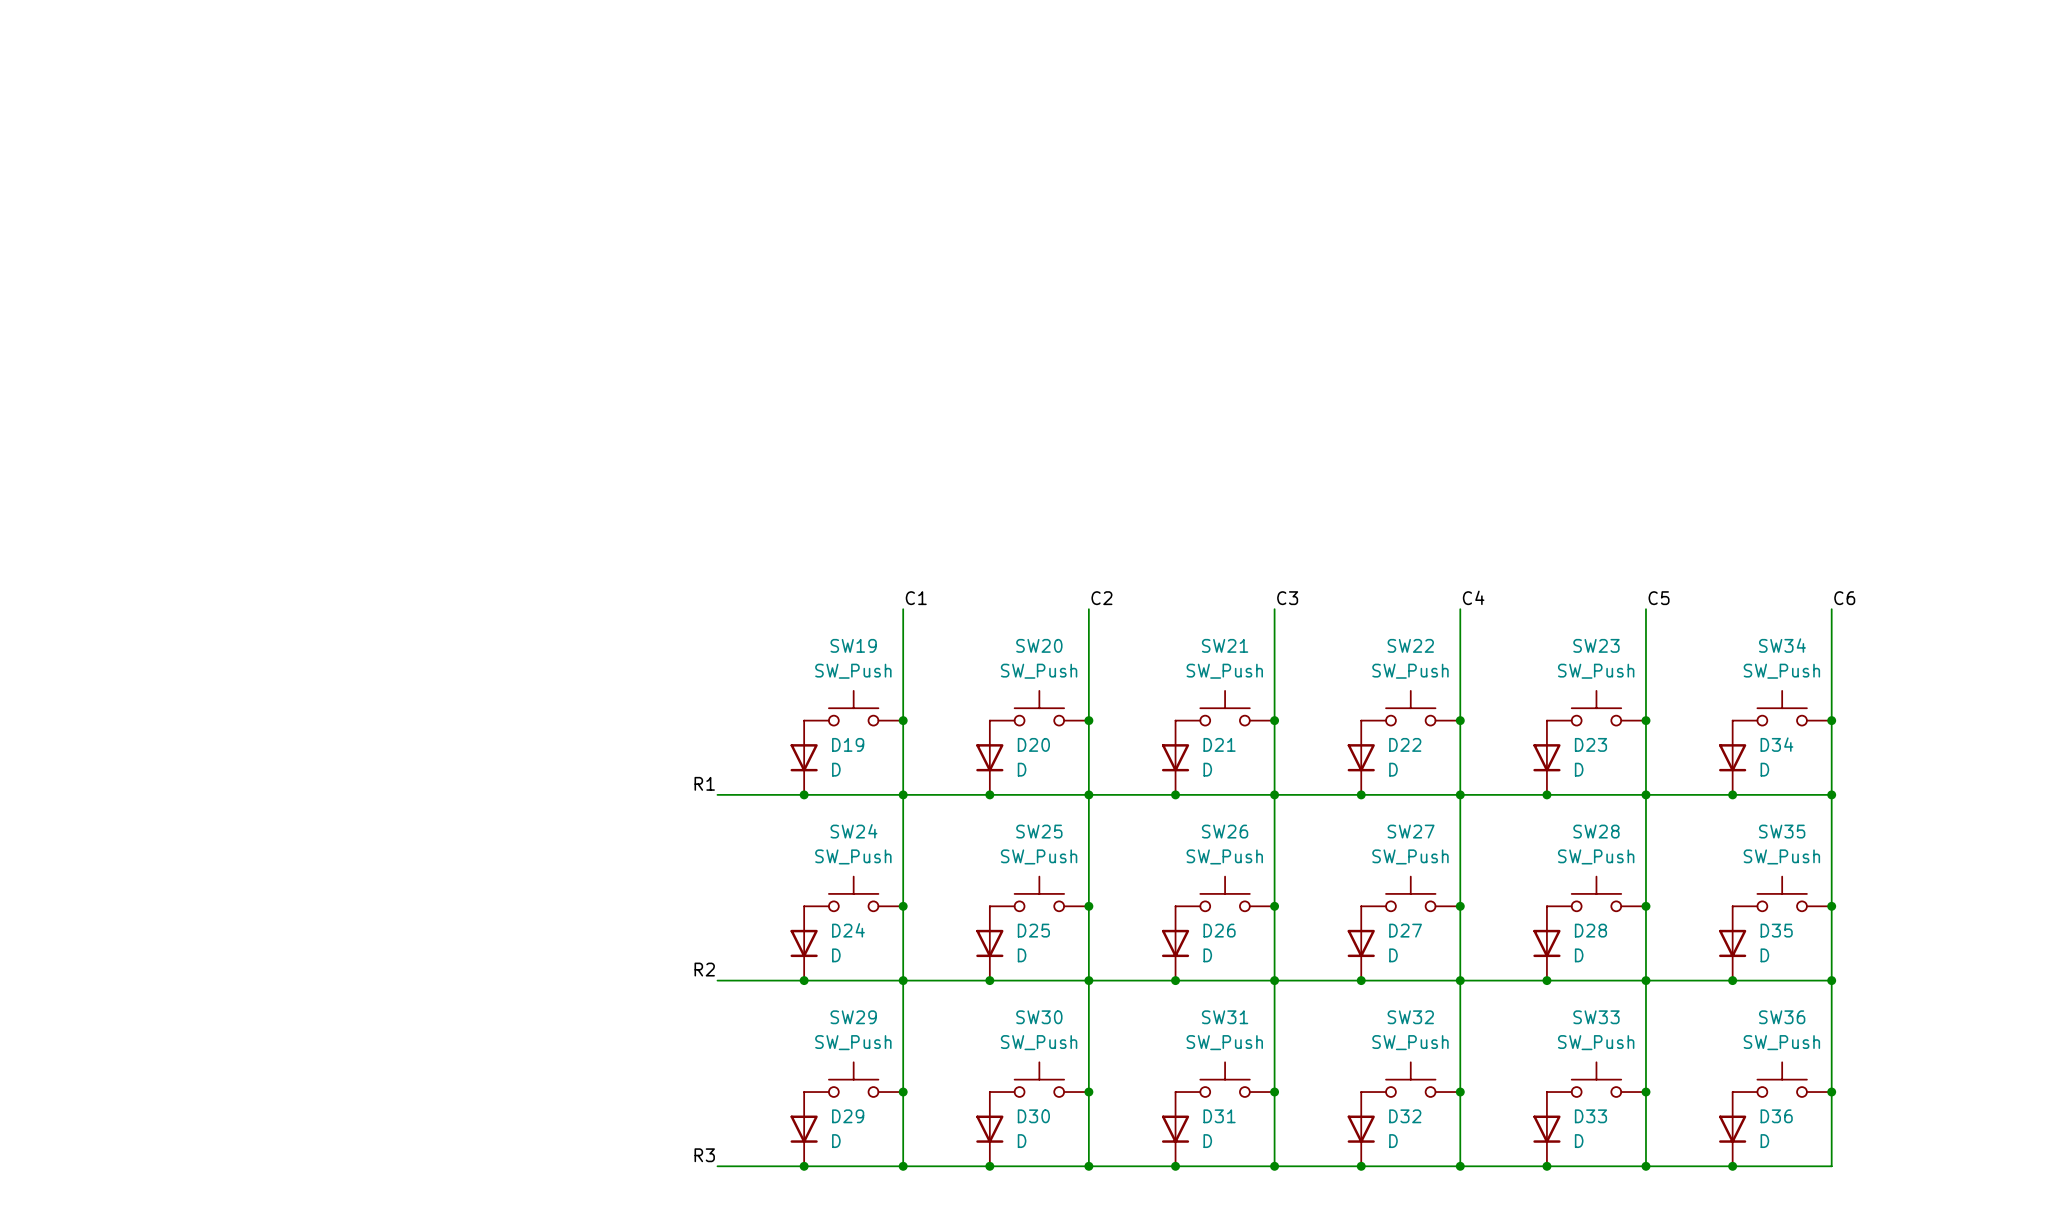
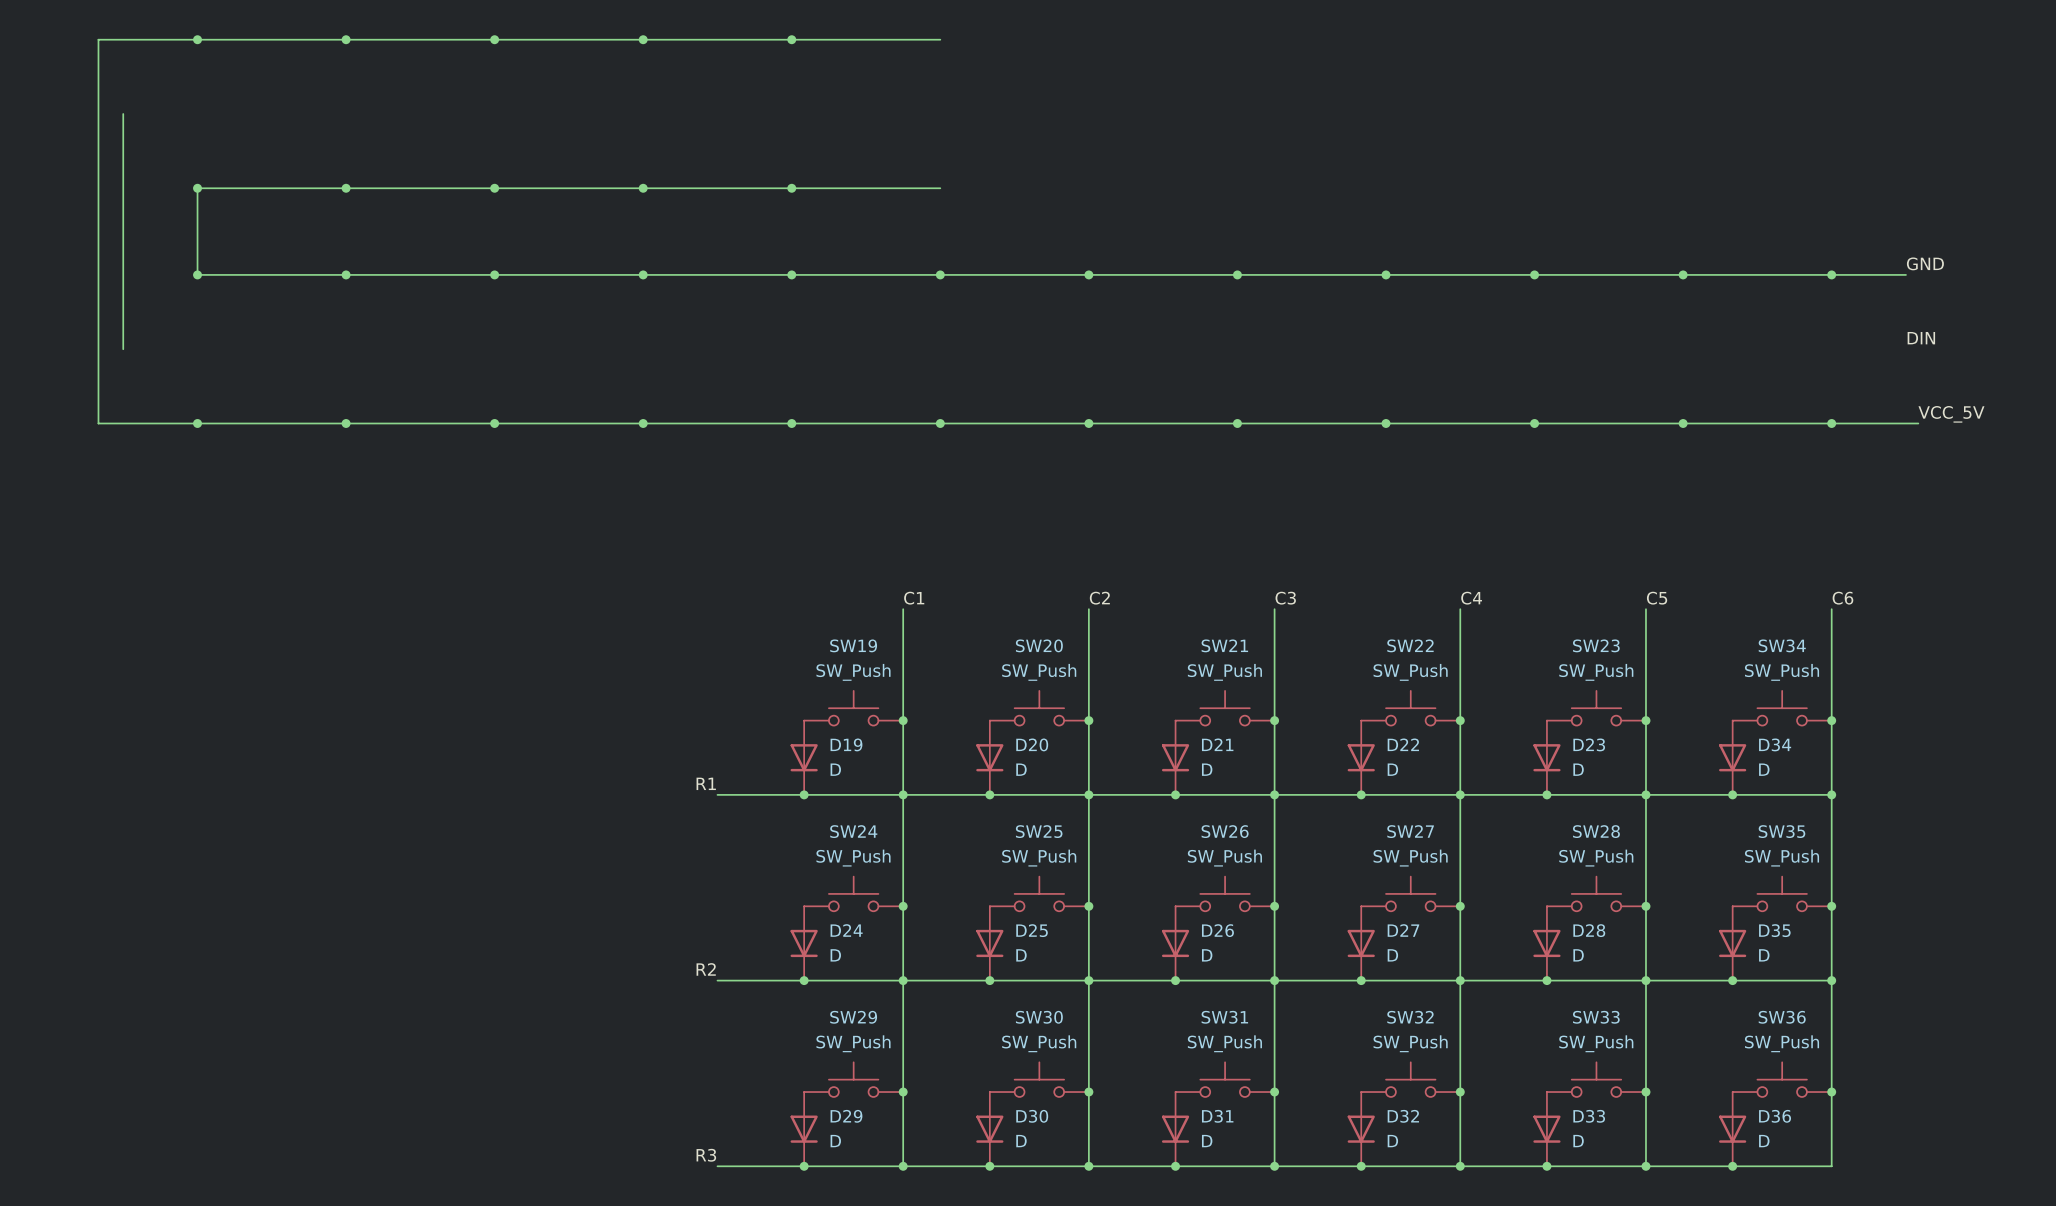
junction: none -> (197, 39)
junction: none -> (346, 39)
junction: none -> (494, 39)
junction: none -> (643, 39)
junction: none -> (791, 39)
wire: none -> (940, 39) (98, 39) (98, 423) (1918, 423)
wire: none -> (123, 113) (123, 349)
junction: none -> (197, 188)
junction: none -> (346, 188)
junction: none -> (494, 188)
junction: none -> (643, 188)
junction: none -> (791, 188)
wire: none -> (940, 188) (197, 188) (197, 274) (1905, 274)
label: none -> GND (1925, 263)
junction: none -> (197, 274)
junction: none -> (346, 274)
junction: none -> (494, 274)
junction: none -> (643, 274)
junction: none -> (791, 274)
junction: none -> (940, 274)
junction: none -> (1088, 274)
junction: none -> (1237, 274)
junction: none -> (1386, 274)
junction: none -> (1534, 274)
junction: none -> (1683, 274)
junction: none -> (1831, 274)
label: none -> DIN (1921, 338)
label: none -> VCC_5V (1951, 414)
junction: none -> (197, 423)
junction: none -> (346, 423)
junction: none -> (494, 423)
junction: none -> (643, 423)
junction: none -> (791, 423)
junction: none -> (940, 423)
junction: none -> (1088, 423)
junction: none -> (1237, 423)
junction: none -> (1386, 423)
junction: none -> (1534, 423)
junction: none -> (1683, 423)
junction: none -> (1831, 423)

